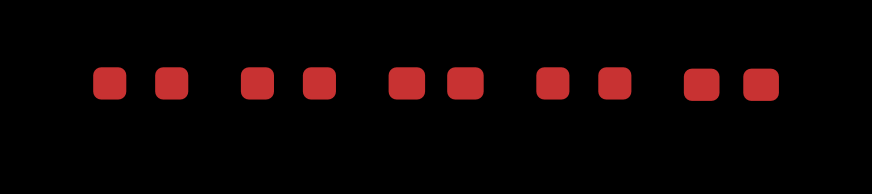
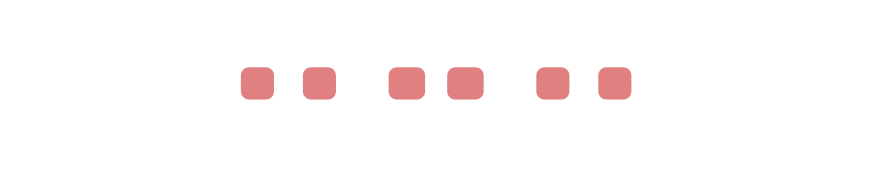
part: (140, 83) -> none
part: (731, 84) -> none

